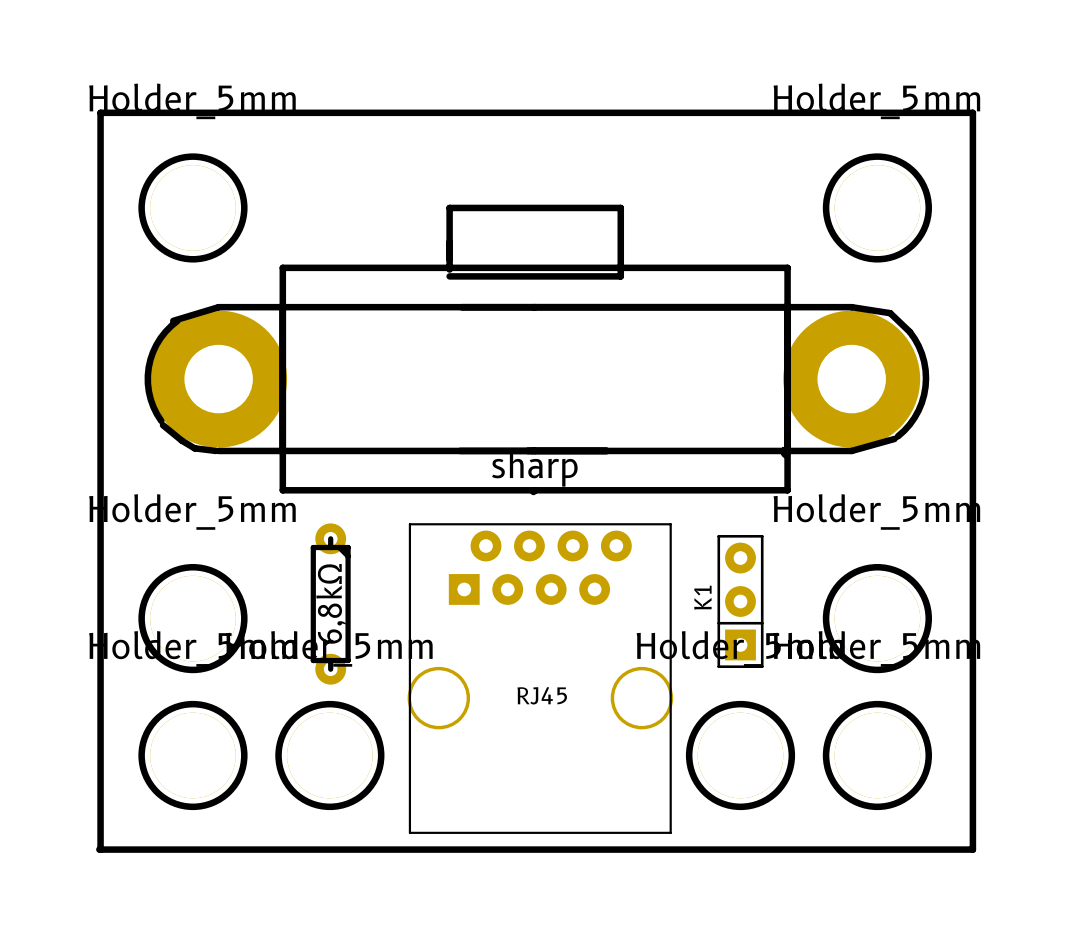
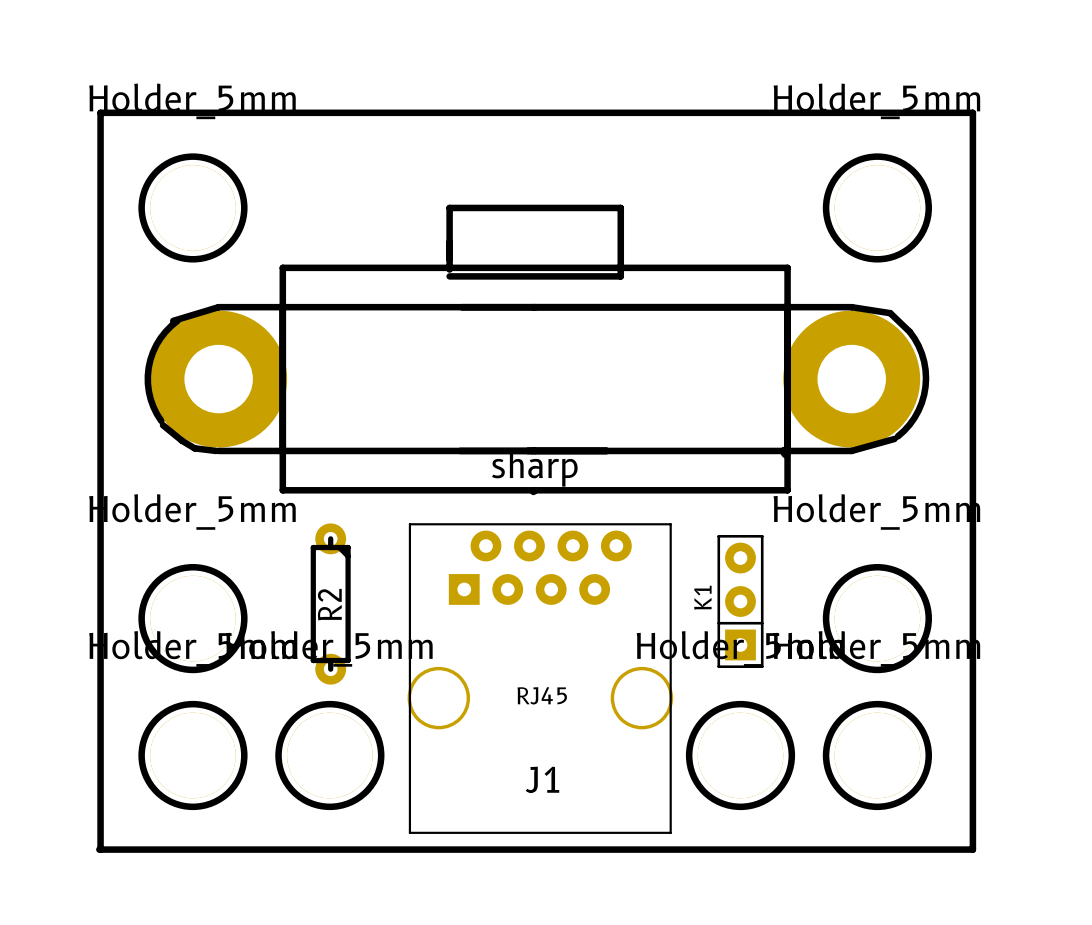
R2 value: 6,8kΩ (331, 603) -> none
R2 name: none -> R2 (329, 604)
J1 name: none -> J1 (542, 779)

